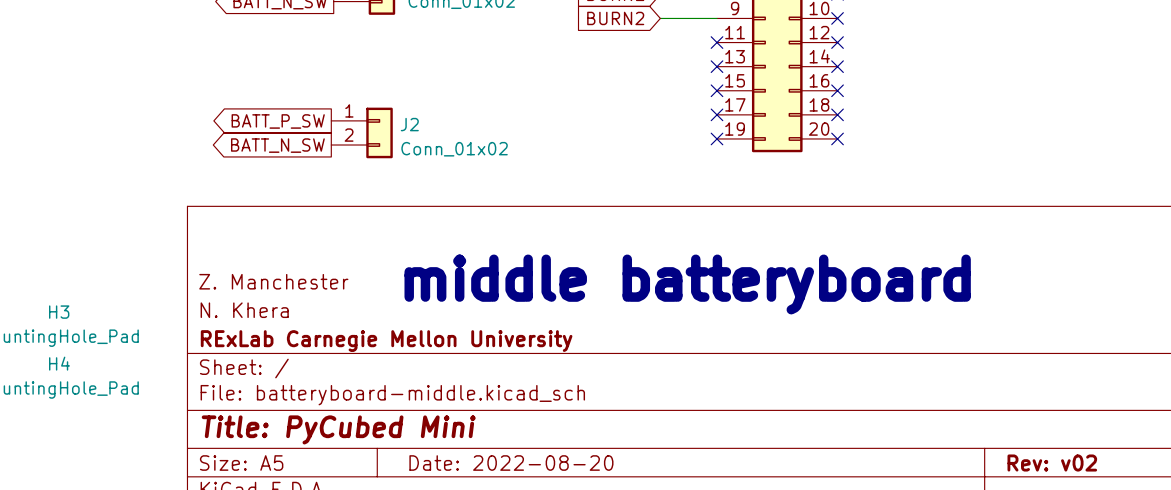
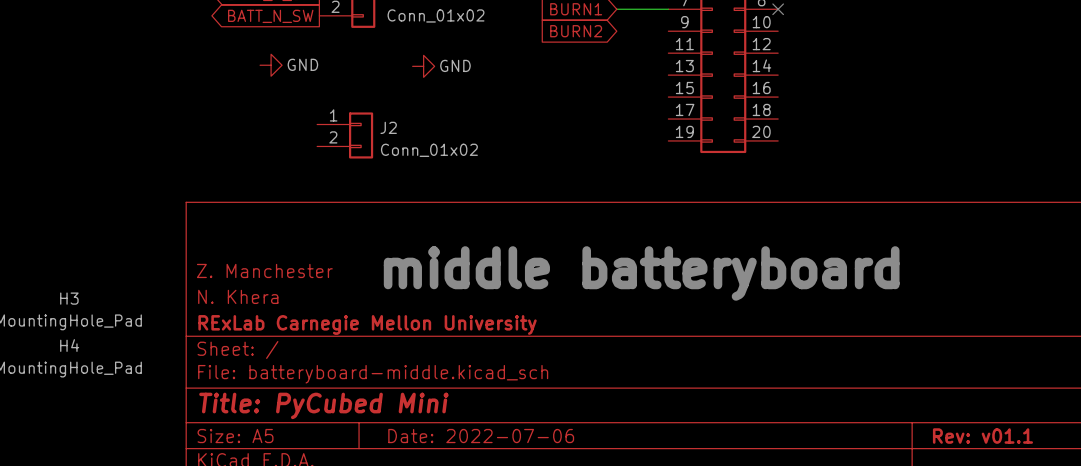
wire: (660, 18) (717, 18) -> none
no-connect mark: (837, 18) -> none
no-connect mark: (717, 42) -> none
no-connect mark: (837, 42) -> none
power symbol: none -> GND (271, 65)
power symbol: none -> GND (423, 66)
no-connect mark: (717, 66) -> none
no-connect mark: (837, 66) -> none
no-connect mark: (717, 90) -> none
no-connect mark: (837, 90) -> none
no-connect mark: (717, 114) -> none
no-connect mark: (837, 114) -> none
global label: BATT_P_SW (278, 121) -> none
no-connect mark: (717, 138) -> none
no-connect mark: (837, 138) -> none
global label: BATT_N_SW (277, 145) -> none
title block: Date: 2022-08-20 (511, 463) -> Date: 2022-07-06 (481, 436)
title block: Rev: v02 (1052, 463) -> Rev: v01.1 (982, 436)

